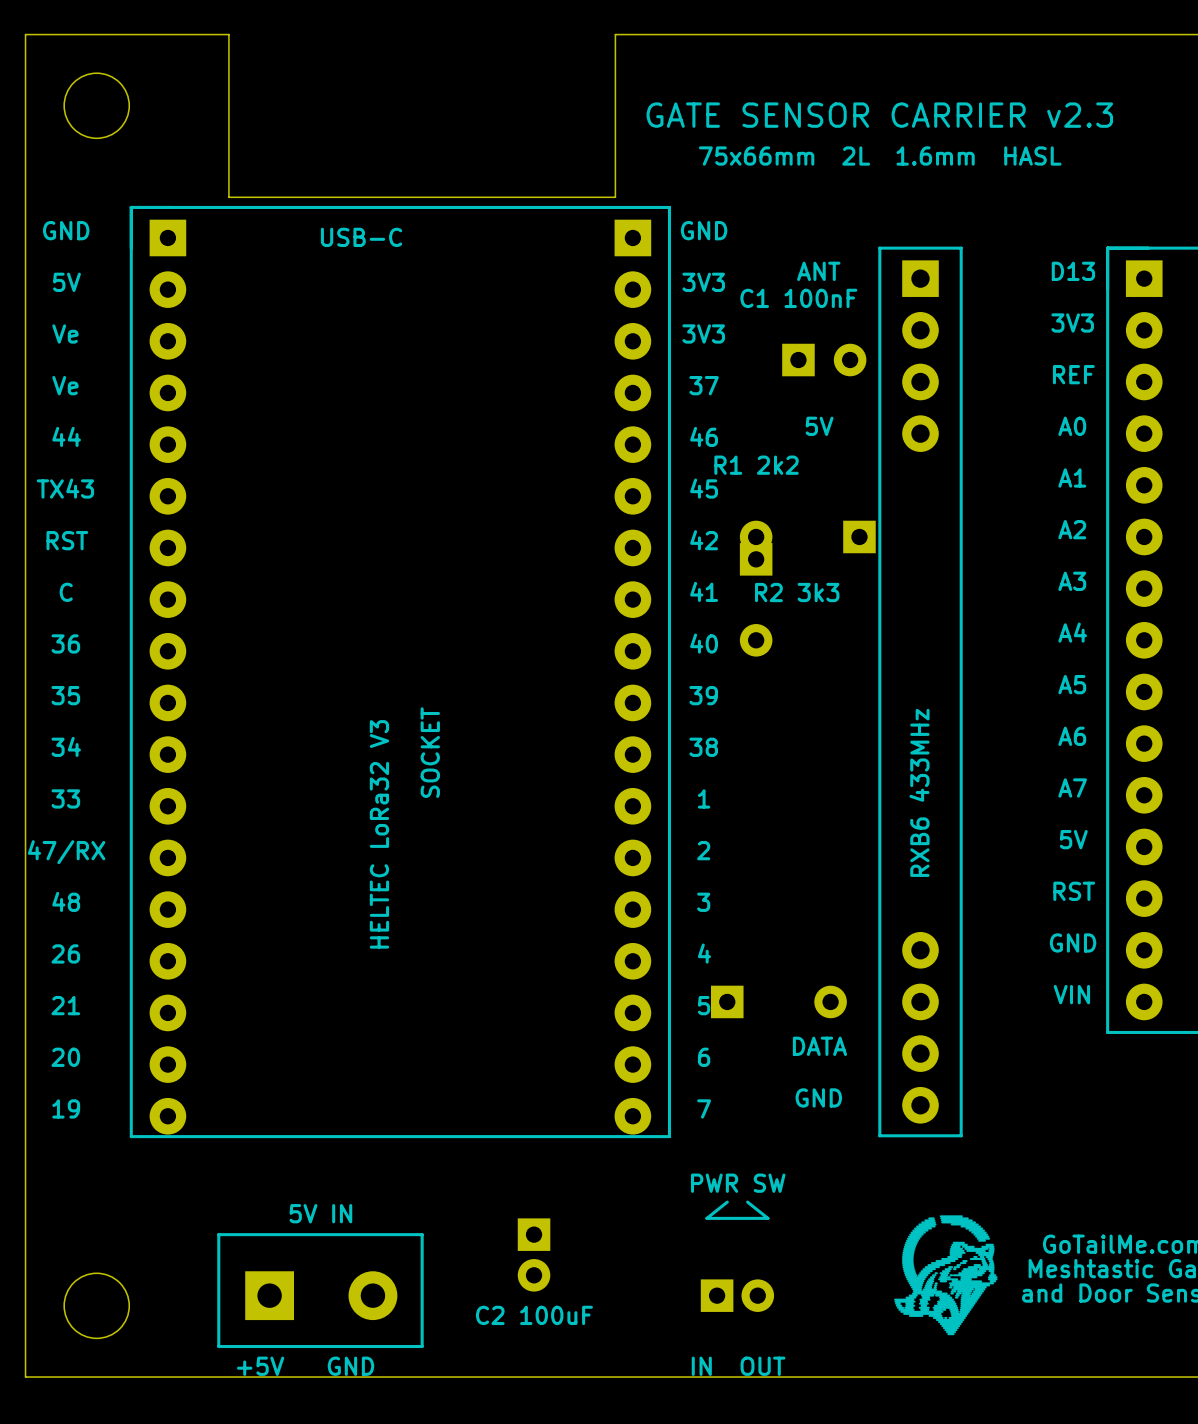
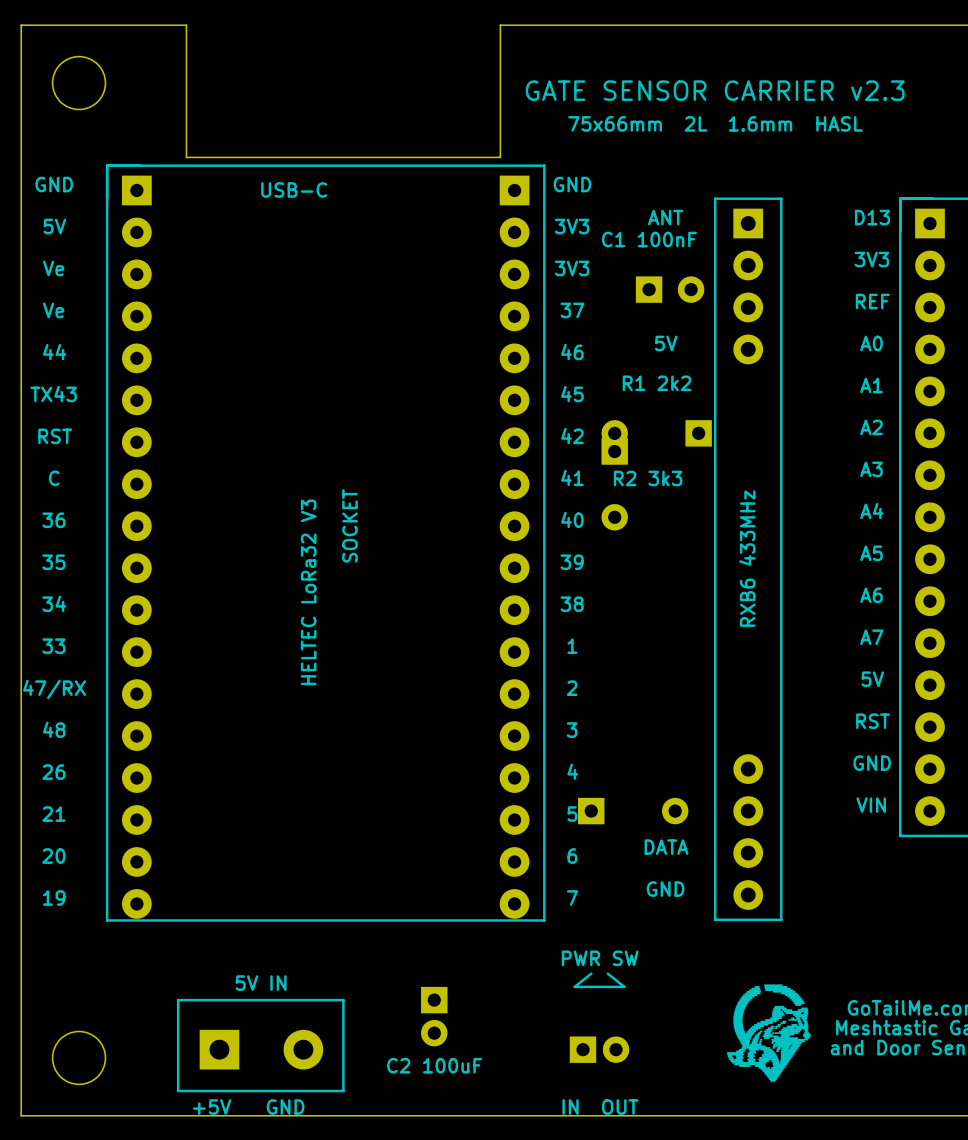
text position: R1 2k2 (756, 465) -> R1 2k2 (657, 383)
text position: SOCKET (430, 752) -> SOCKET (350, 525)
text position: RXB6 433MHz (919, 792) -> RXB6 433MHz (747, 558)
text position: HELTEC LoRa32 V3 (379, 834) -> HELTEC LoRa32 V3 (308, 592)

